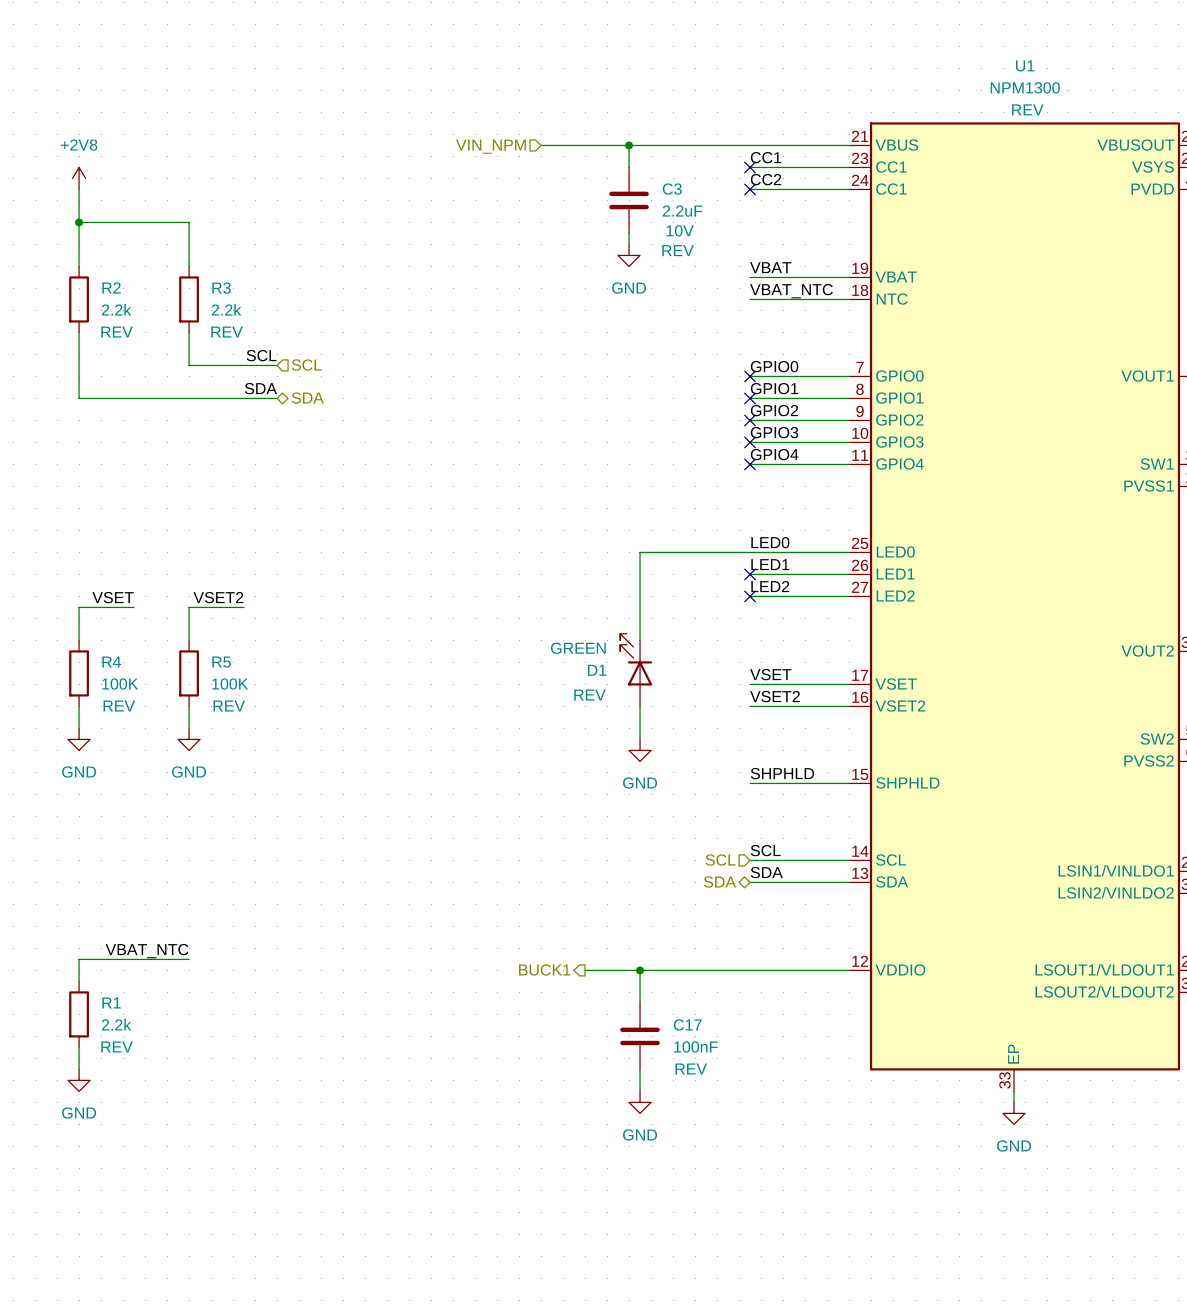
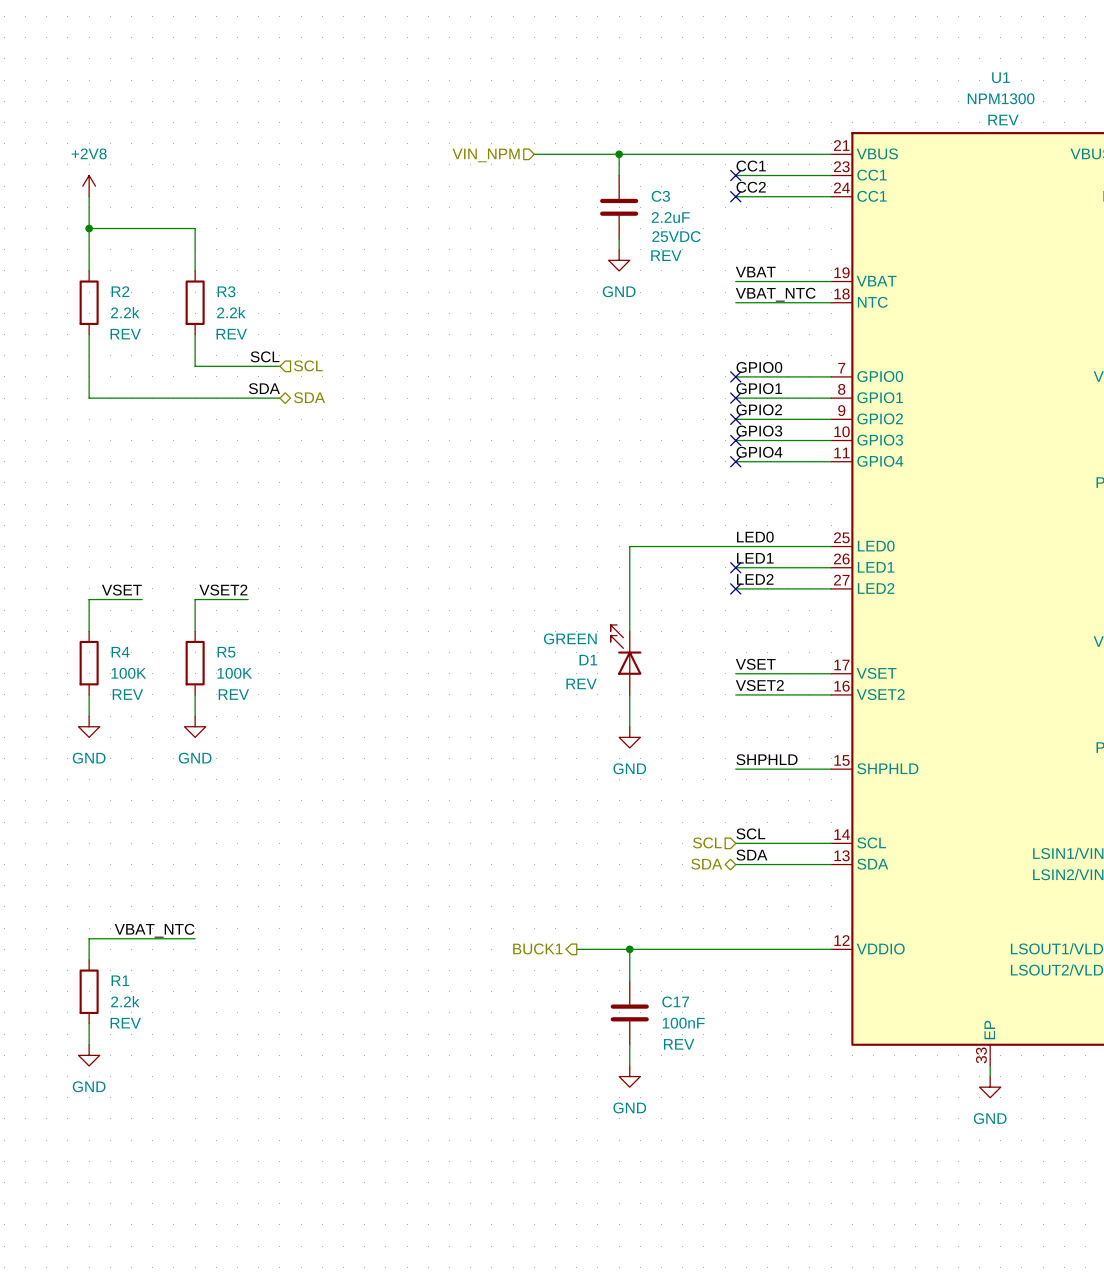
C3 text: 10V (680, 230) -> 25VDC (676, 236)

